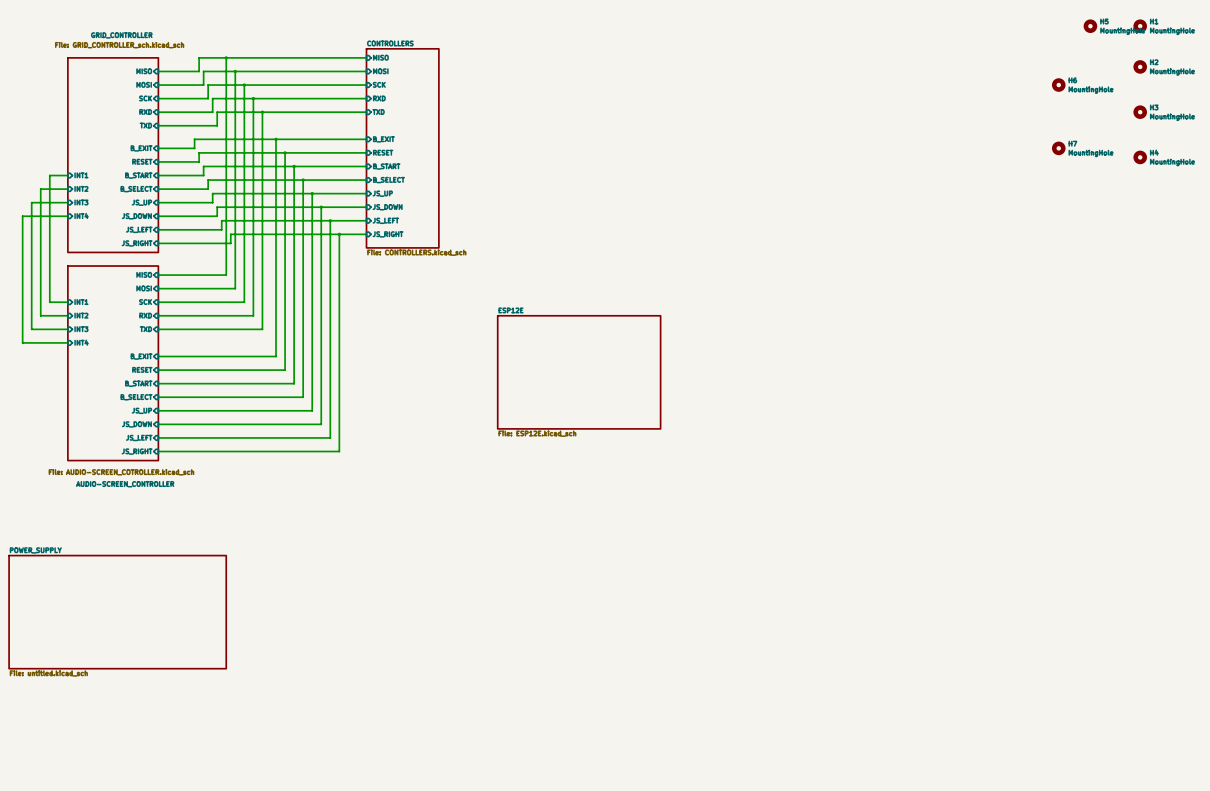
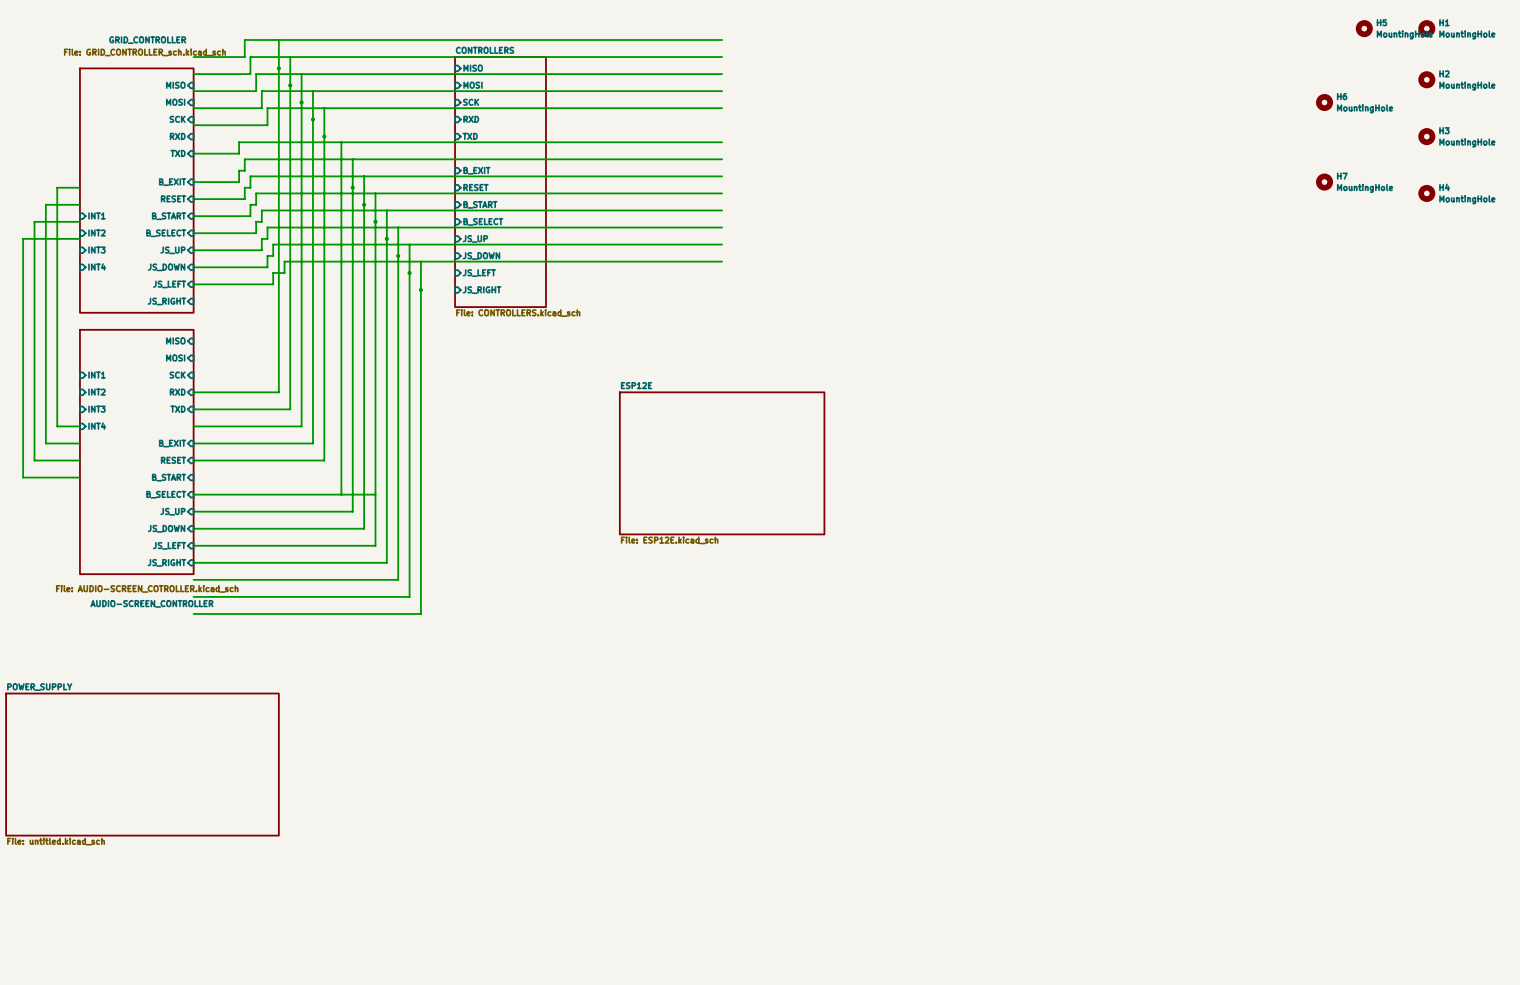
wire: none -> (278, 39) (278, 68)
wire: none -> (722, 39) (244, 39) (244, 57) (193, 57)
wire: none -> (290, 57) (290, 85)
wire: none -> (722, 57) (250, 57) (250, 74) (193, 74)
wire: (366, 57) (199, 57) (199, 71) (158, 71) -> none
wire: none -> (301, 74) (301, 102)
wire: none -> (722, 74) (256, 74) (256, 91) (193, 91)
wire: (366, 71) (203, 71) (203, 85) (158, 85) -> none
wire: none -> (312, 91) (312, 119)
wire: none -> (722, 91) (261, 91) (261, 108) (193, 108)
wire: (366, 85) (208, 85) (208, 98) (158, 98) -> none
wire: none -> (324, 108) (324, 136)
wire: none -> (722, 108) (267, 108) (267, 125) (193, 125)
wire: (366, 98) (212, 98) (212, 112) (158, 112) -> none
wire: (366, 112) (217, 112) (217, 125) (194, 125) -> (722, 142) (239, 142) (239, 153)
wire: none -> (341, 142) (341, 170)
wire: none -> (352, 159) (352, 187)
wire: (199, 139) (366, 139) -> (244, 170) (244, 159) (722, 159)
wire: none -> (364, 176) (364, 204)
wire: (203, 152) (366, 152) -> (250, 187) (250, 176) (722, 176)
wire: none -> (375, 193) (375, 221)
wire: (208, 166) (366, 166) -> (256, 204) (256, 193) (722, 193)
wire: none -> (386, 210) (386, 238)
wire: (49, 175) (67, 175) -> (57, 216) (57, 187) (79, 187)
wire: (212, 180) (366, 180) -> (261, 221) (261, 210) (722, 210)
wire: none -> (398, 227) (398, 255)
wire: (40, 189) (67, 189) -> (45, 233) (45, 204) (79, 204)
wire: (217, 193) (366, 193) -> (267, 238) (267, 227) (722, 227)
wire: none -> (409, 244) (409, 272)
wire: (31, 202) (67, 202) -> (34, 250) (34, 221) (79, 221)
wire: (221, 207) (366, 207) -> (273, 255) (273, 244) (722, 244)
wire: none -> (420, 261) (420, 290)
wire: (22, 216) (67, 216) -> (23, 267) (23, 238) (79, 238)
wire: (230, 220) (366, 220) -> (284, 272) (284, 261) (722, 261)
wire: (366, 234) (230, 234) (230, 243) (158, 243) -> none
wire: (158, 275) (226, 275) -> none
wire: (158, 288) (235, 288) -> none
wire: (49, 302) (67, 302) -> (57, 375) (57, 426)
wire: (158, 302) (244, 302) -> (193, 426) (301, 426) (301, 375)
wire: (40, 315) (67, 315) -> (45, 392) (45, 443) (79, 443)
wire: (226, 315) (253, 315) -> (278, 392) (278, 341)
wire: none -> (312, 392) (312, 443)
wire: (31, 329) (67, 329) -> (34, 409) (34, 460) (79, 460)
wire: (235, 329) (262, 329) -> (290, 409) (290, 358)
wire: (22, 342) (49, 342) -> (23, 426) (23, 477) (79, 477)
wire: (253, 356) (276, 356) -> (341, 494) (341, 443)
wire: (262, 370) (285, 370) -> (324, 460) (324, 409)
wire: (158, 383) (294, 383) -> none
wire: (285, 410) (312, 410) -> (352, 511) (352, 460)
wire: (294, 424) (321, 424) -> (364, 528) (364, 477)
wire: none -> (398, 528) (398, 579) (193, 579)
wire: (303, 437) (330, 437) -> (375, 545) (375, 494)
wire: none -> (409, 545) (409, 596) (193, 596)
wire: (312, 451) (339, 451) -> (386, 562) (386, 511)
wire: none -> (420, 562) (420, 613) (193, 613)

